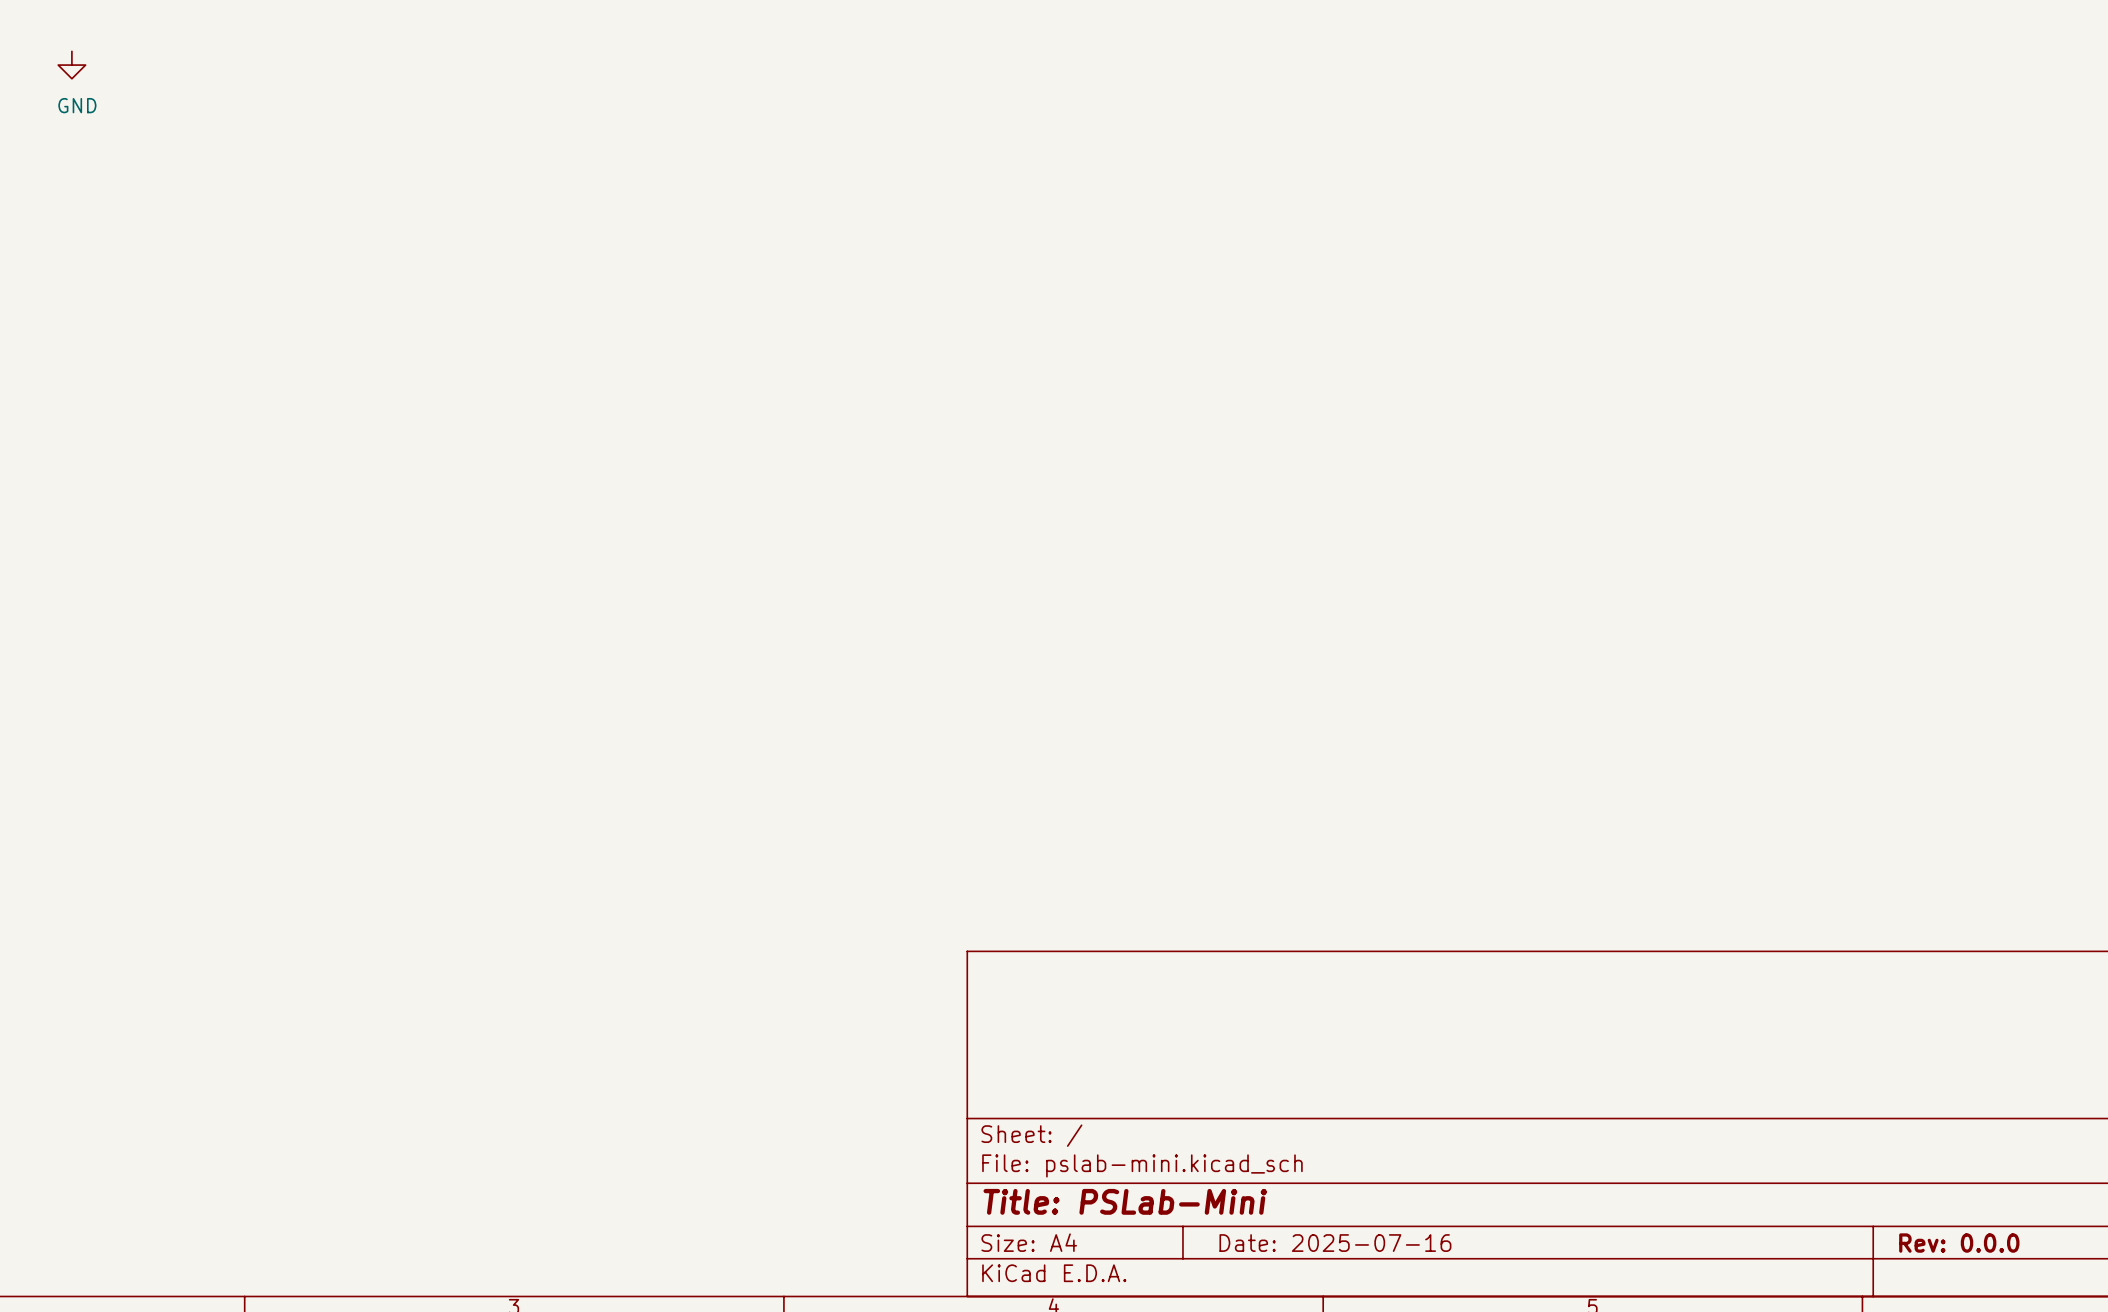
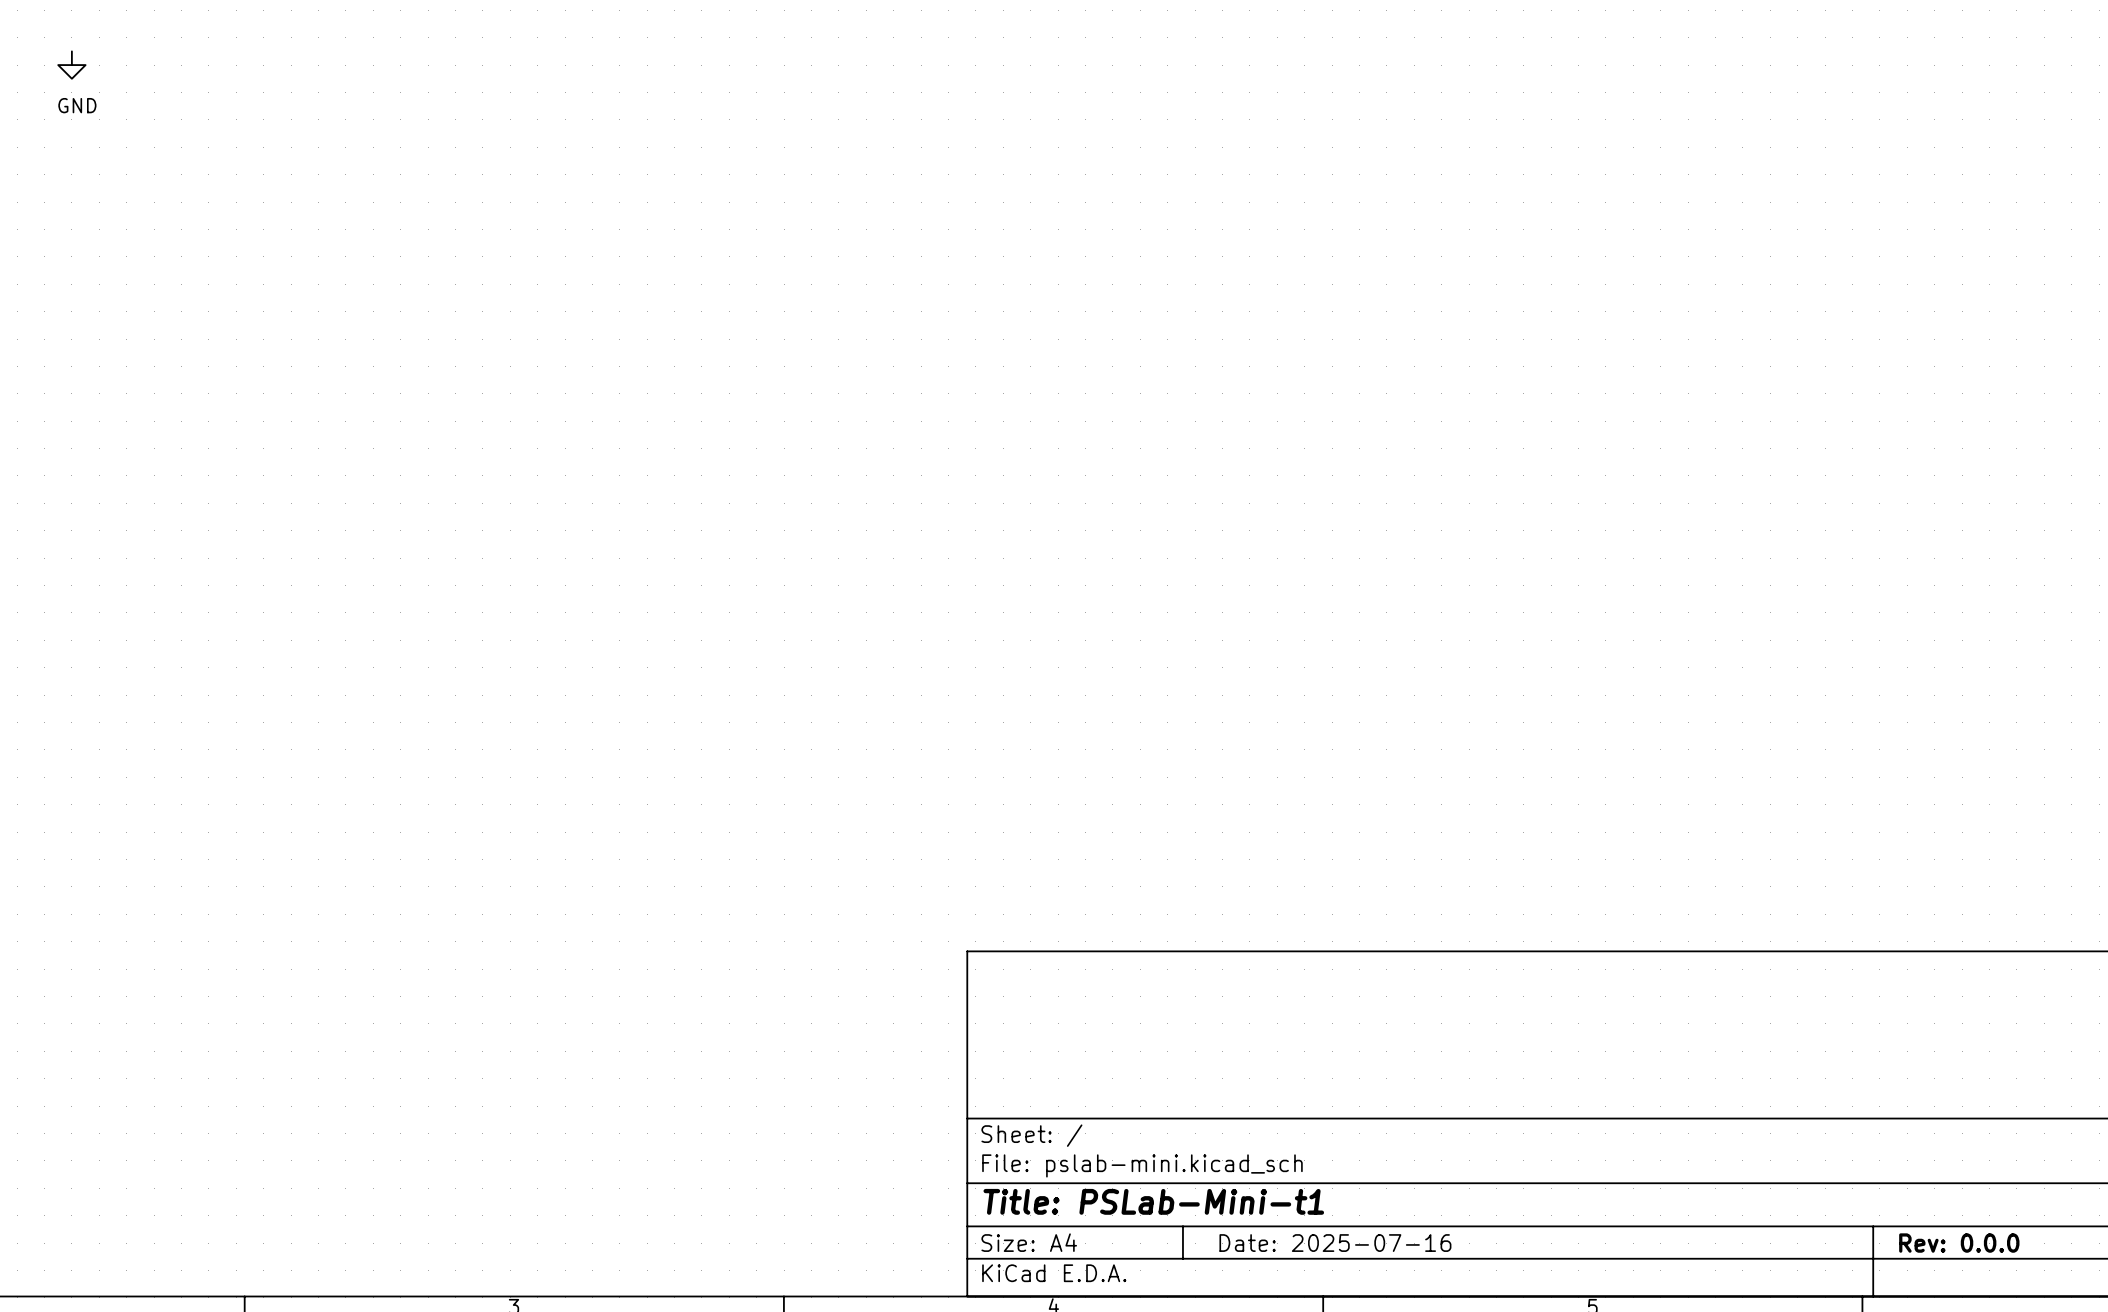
title block: Title: PSLab-Mini (1125, 1201) -> Title: PSLab-Mini-t1 (1153, 1201)

